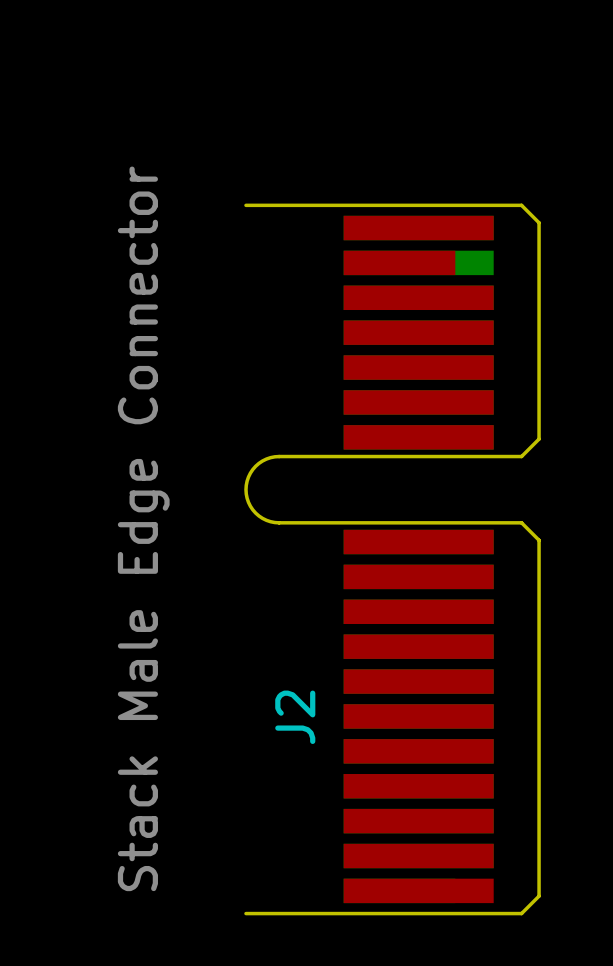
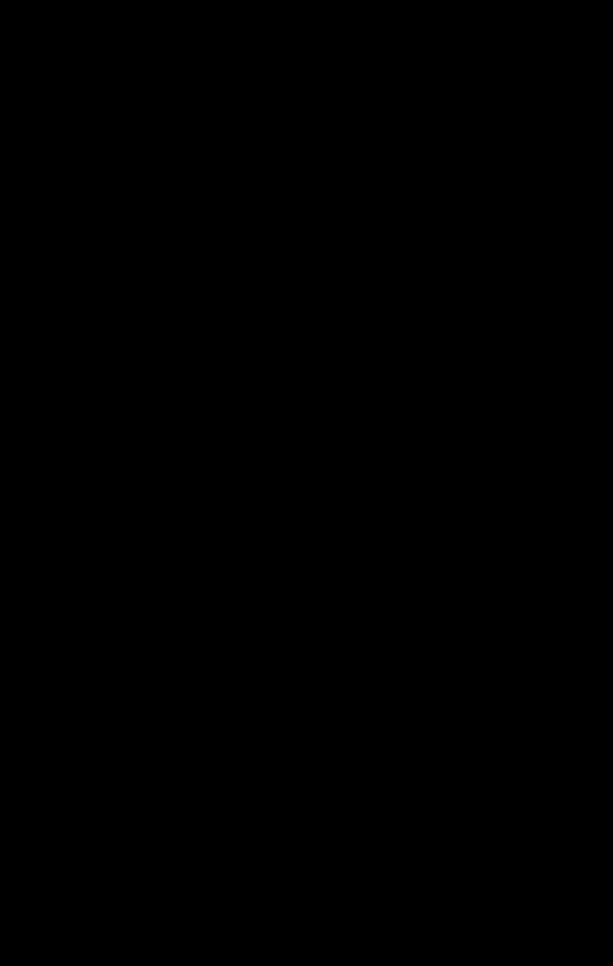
J2: Stack Male Edge Connector (392, 559) -> none

